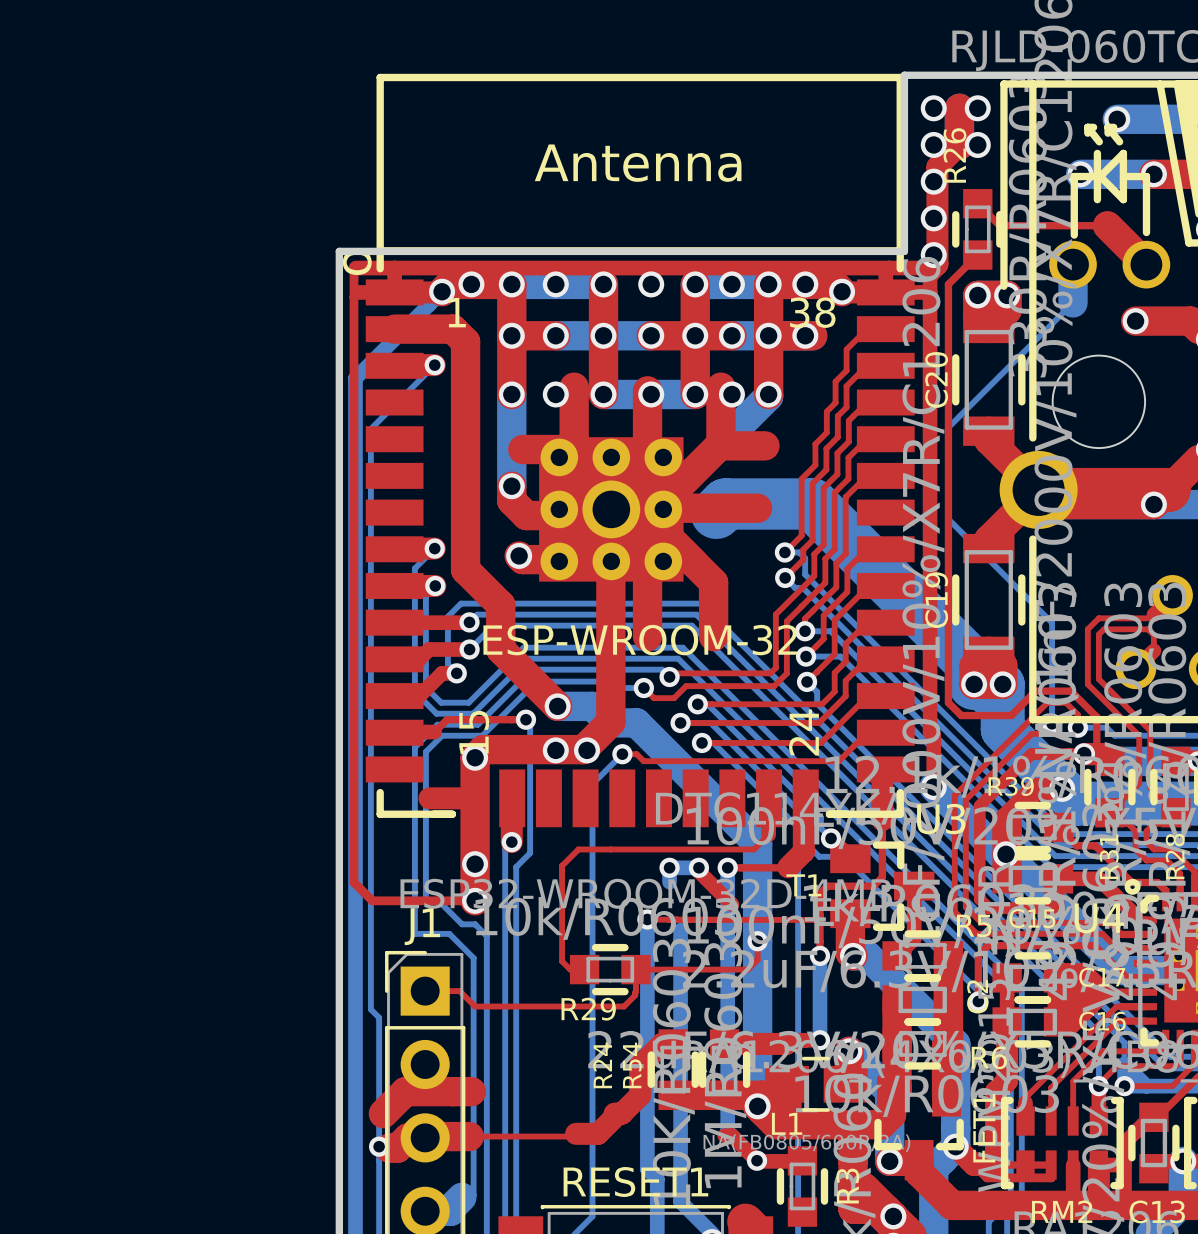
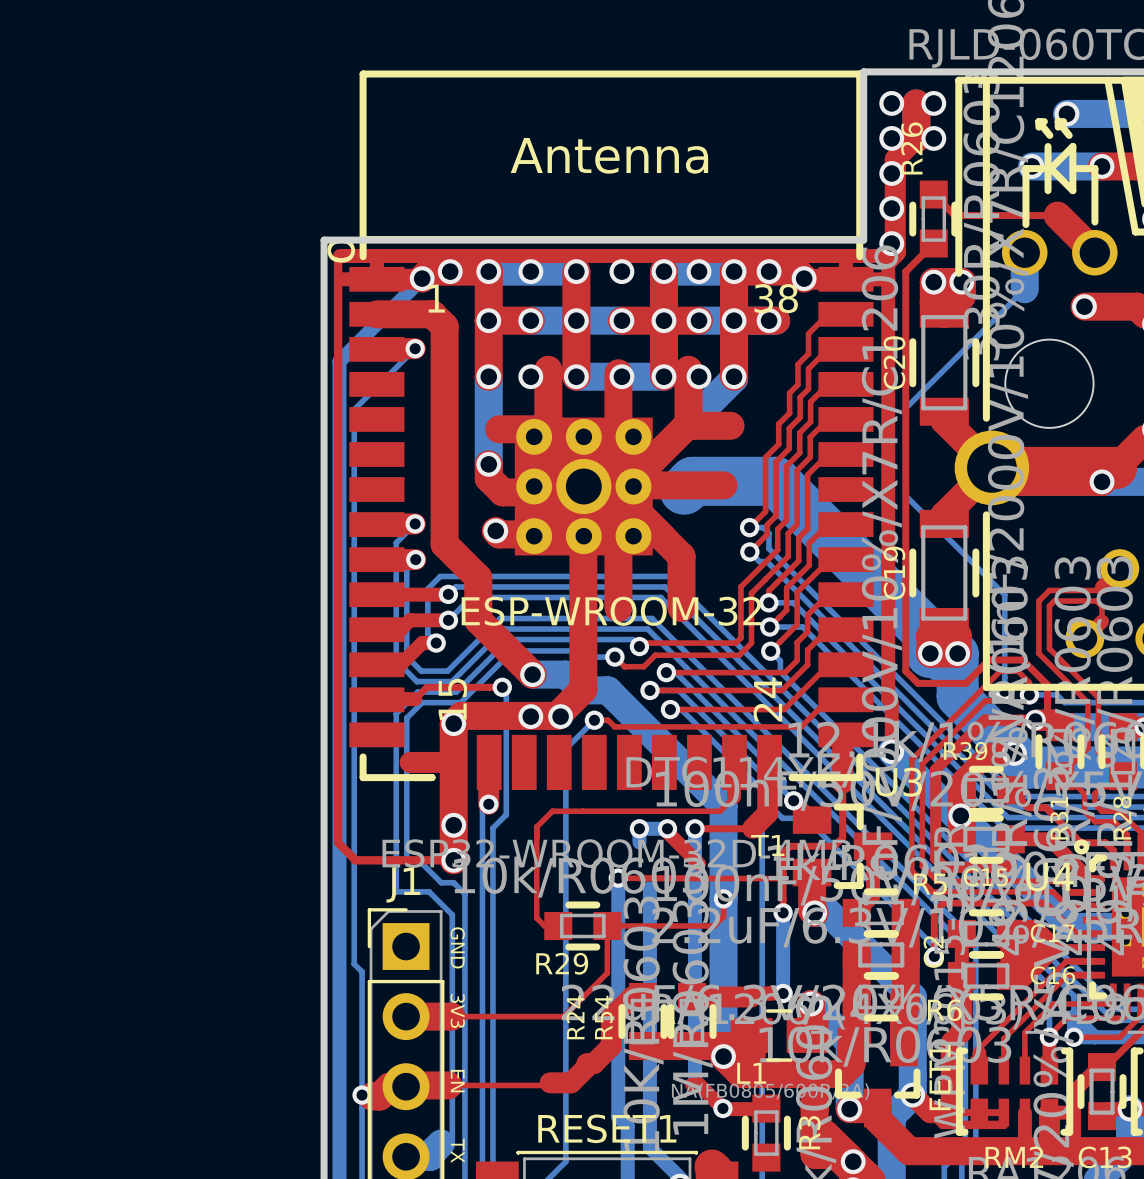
top track: (425, 991) (459, 991) (475, 1006) (624, 1006) (635, 995) (635, 991) -> (406, 1016) (563, 1016) (607, 973) (607, 947)
text: none -> GND (457, 947)
text: none -> 3V3 (457, 1010)
top track: (471, 1091) (405, 1091) (383, 1113) -> none
text: none -> EN (457, 1081)
text: none -> TX (457, 1150)

